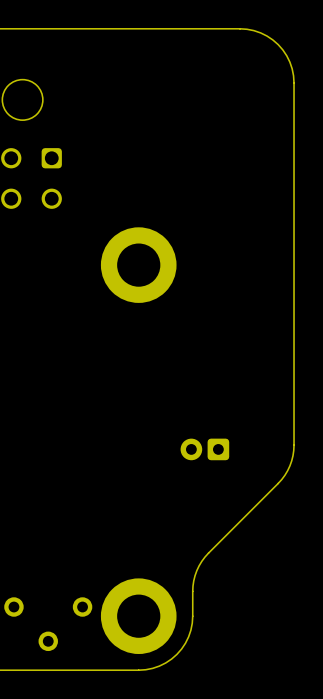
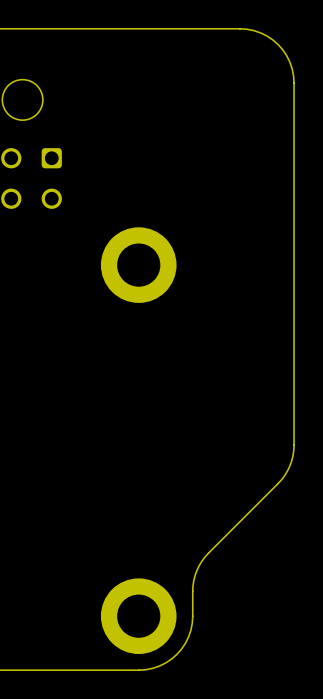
part: (204, 449) -> none
part: (48, 624) -> none

